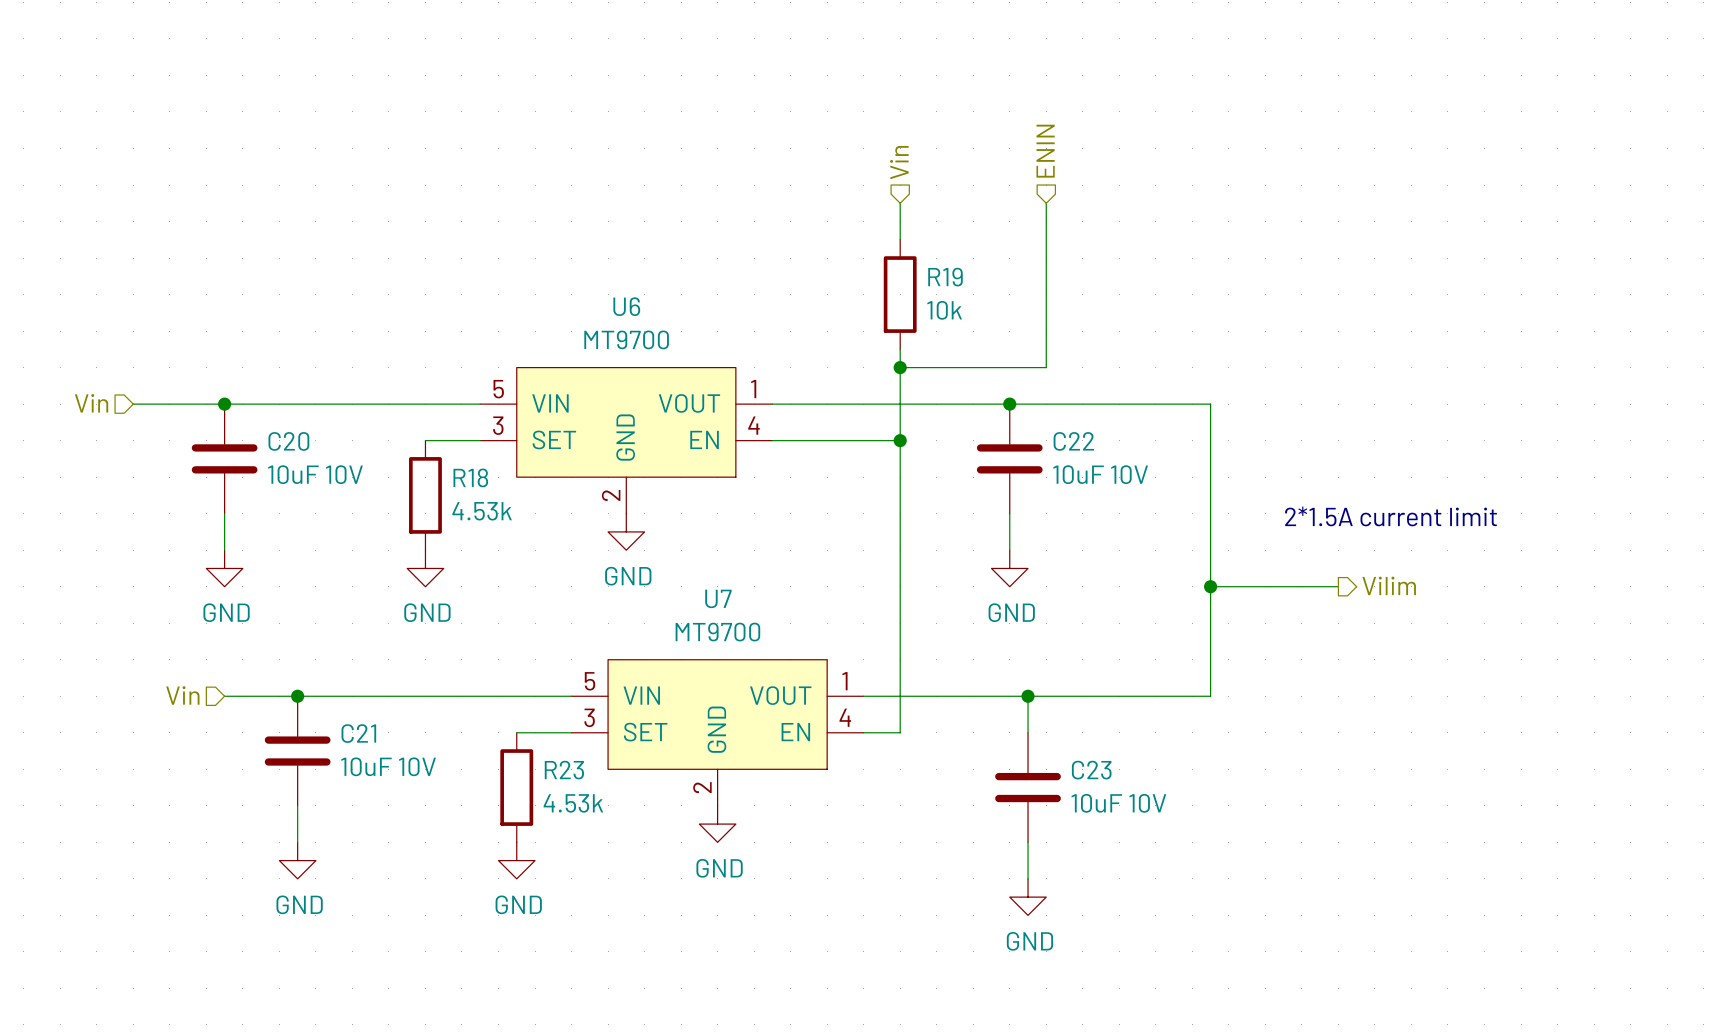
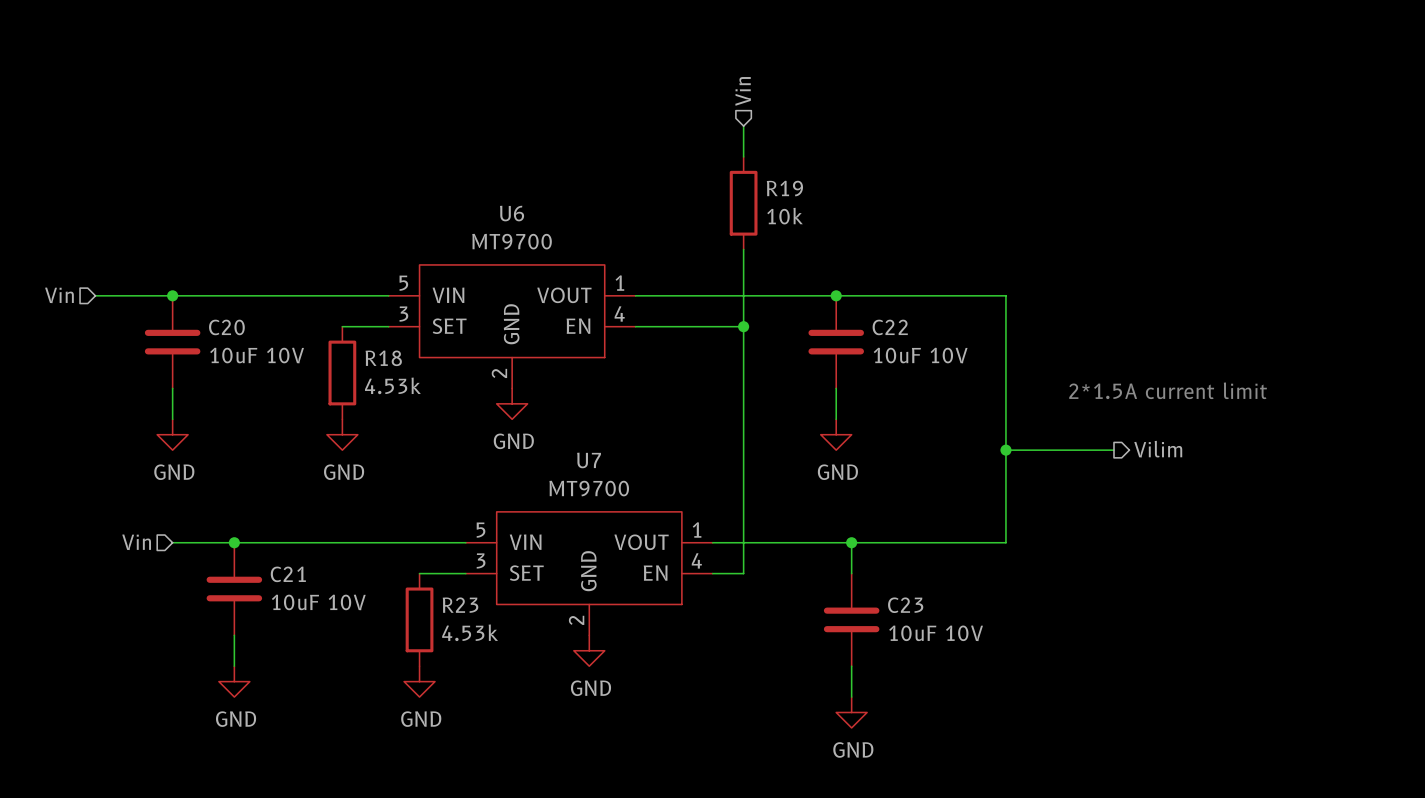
hierarchical label: ENIN (1045, 151) -> none
wire: (1046, 203) (1046, 367) (900, 367) -> none
junction: (900, 367) -> none

